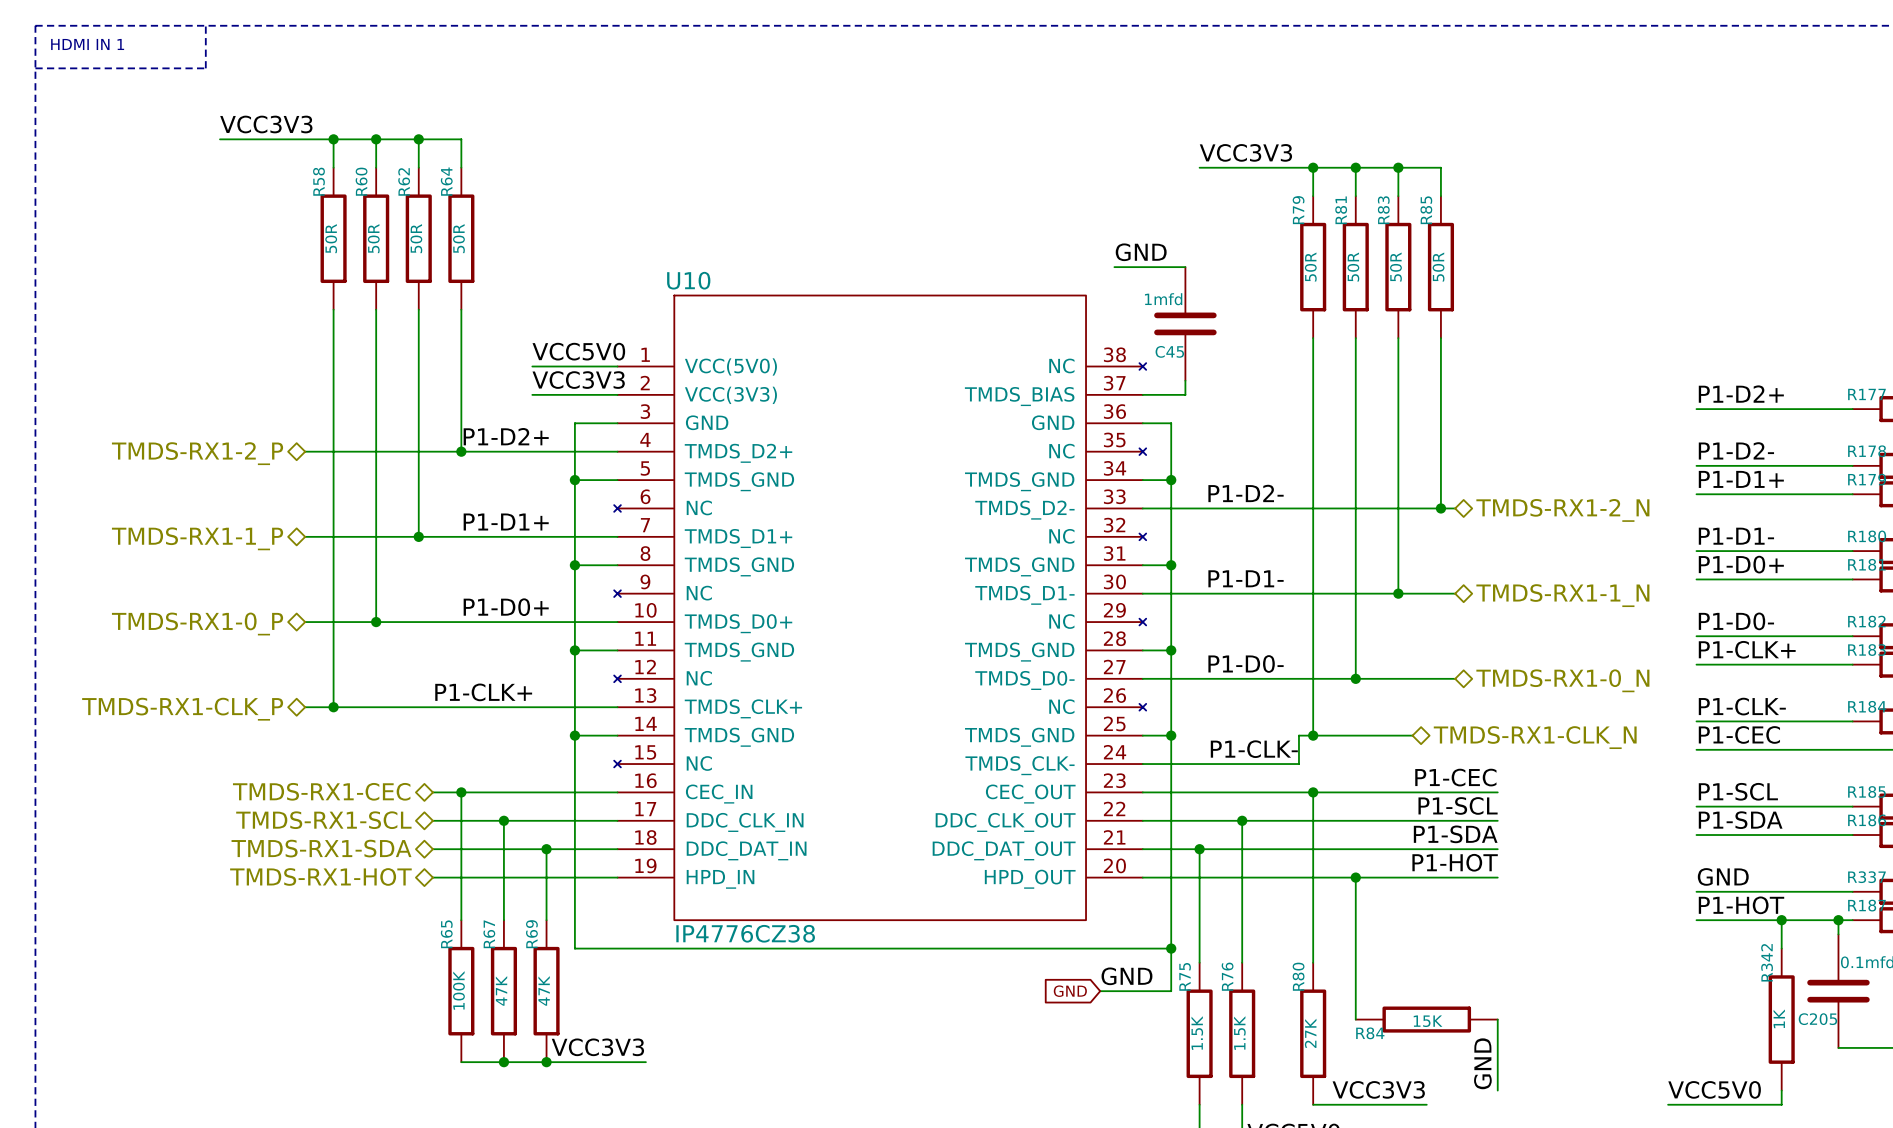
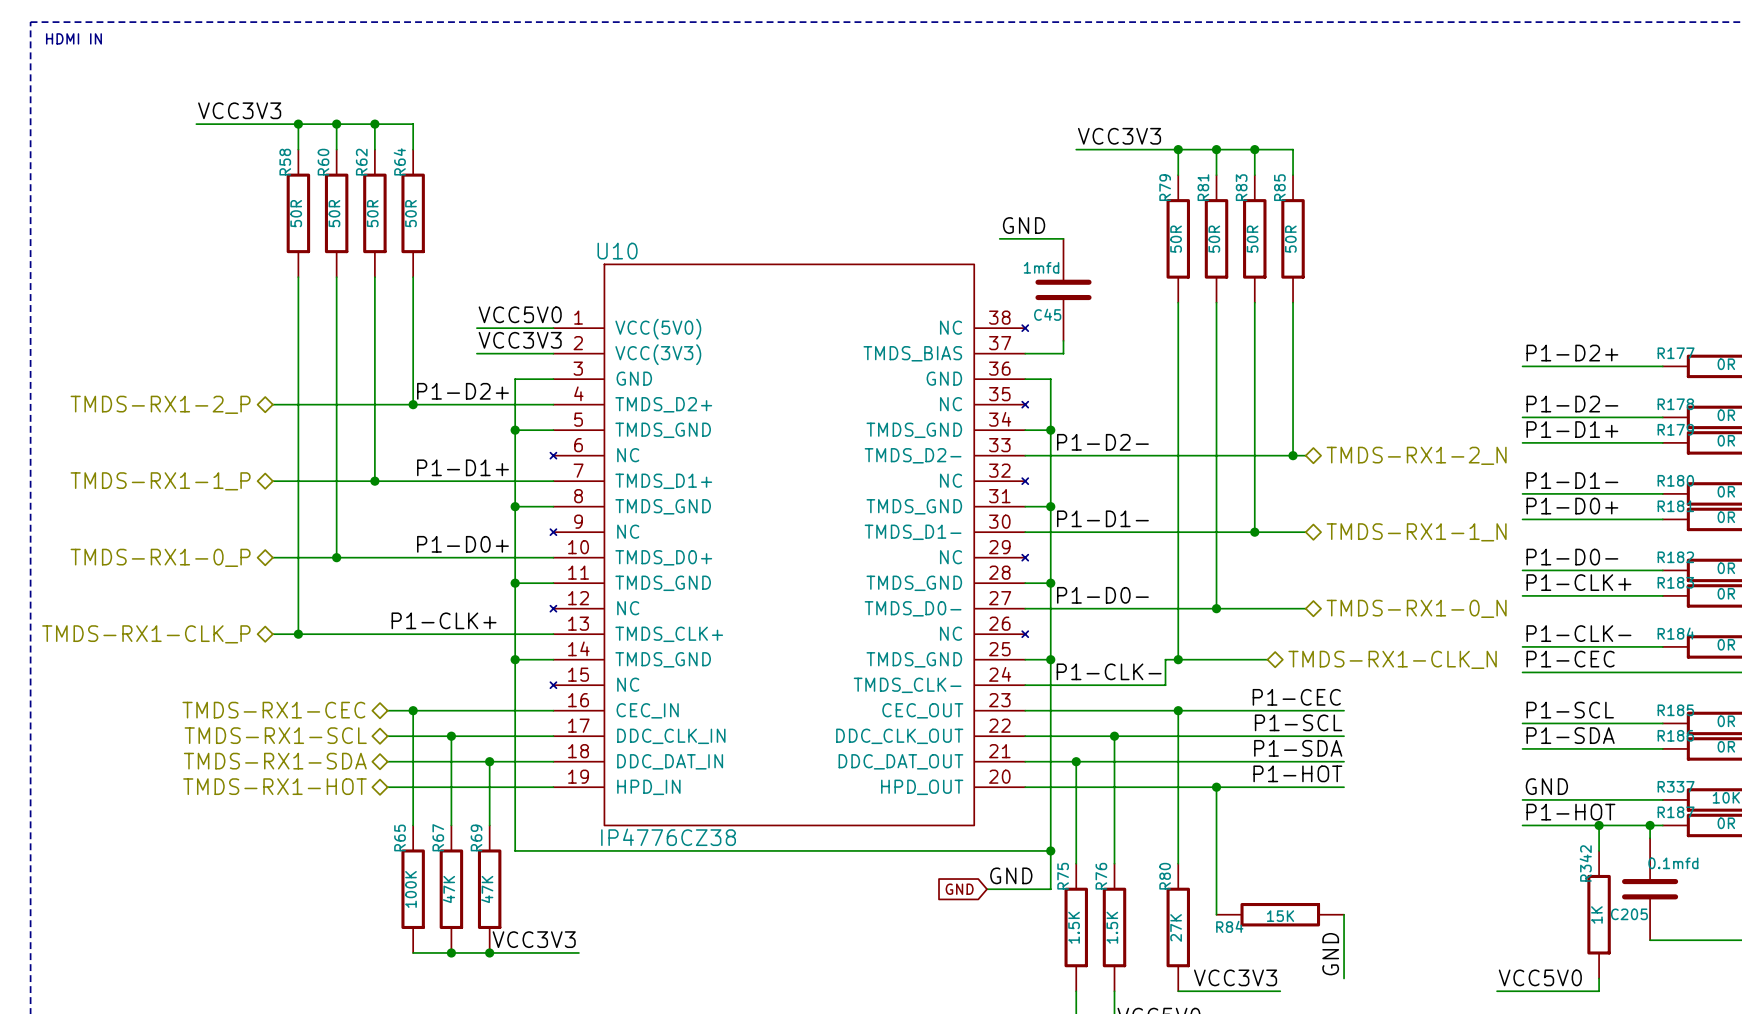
line: (205, 25) (205, 68) (35, 68) -> none
text: HDMI IN 1 (87, 44) -> HDMI IN (73, 38)

